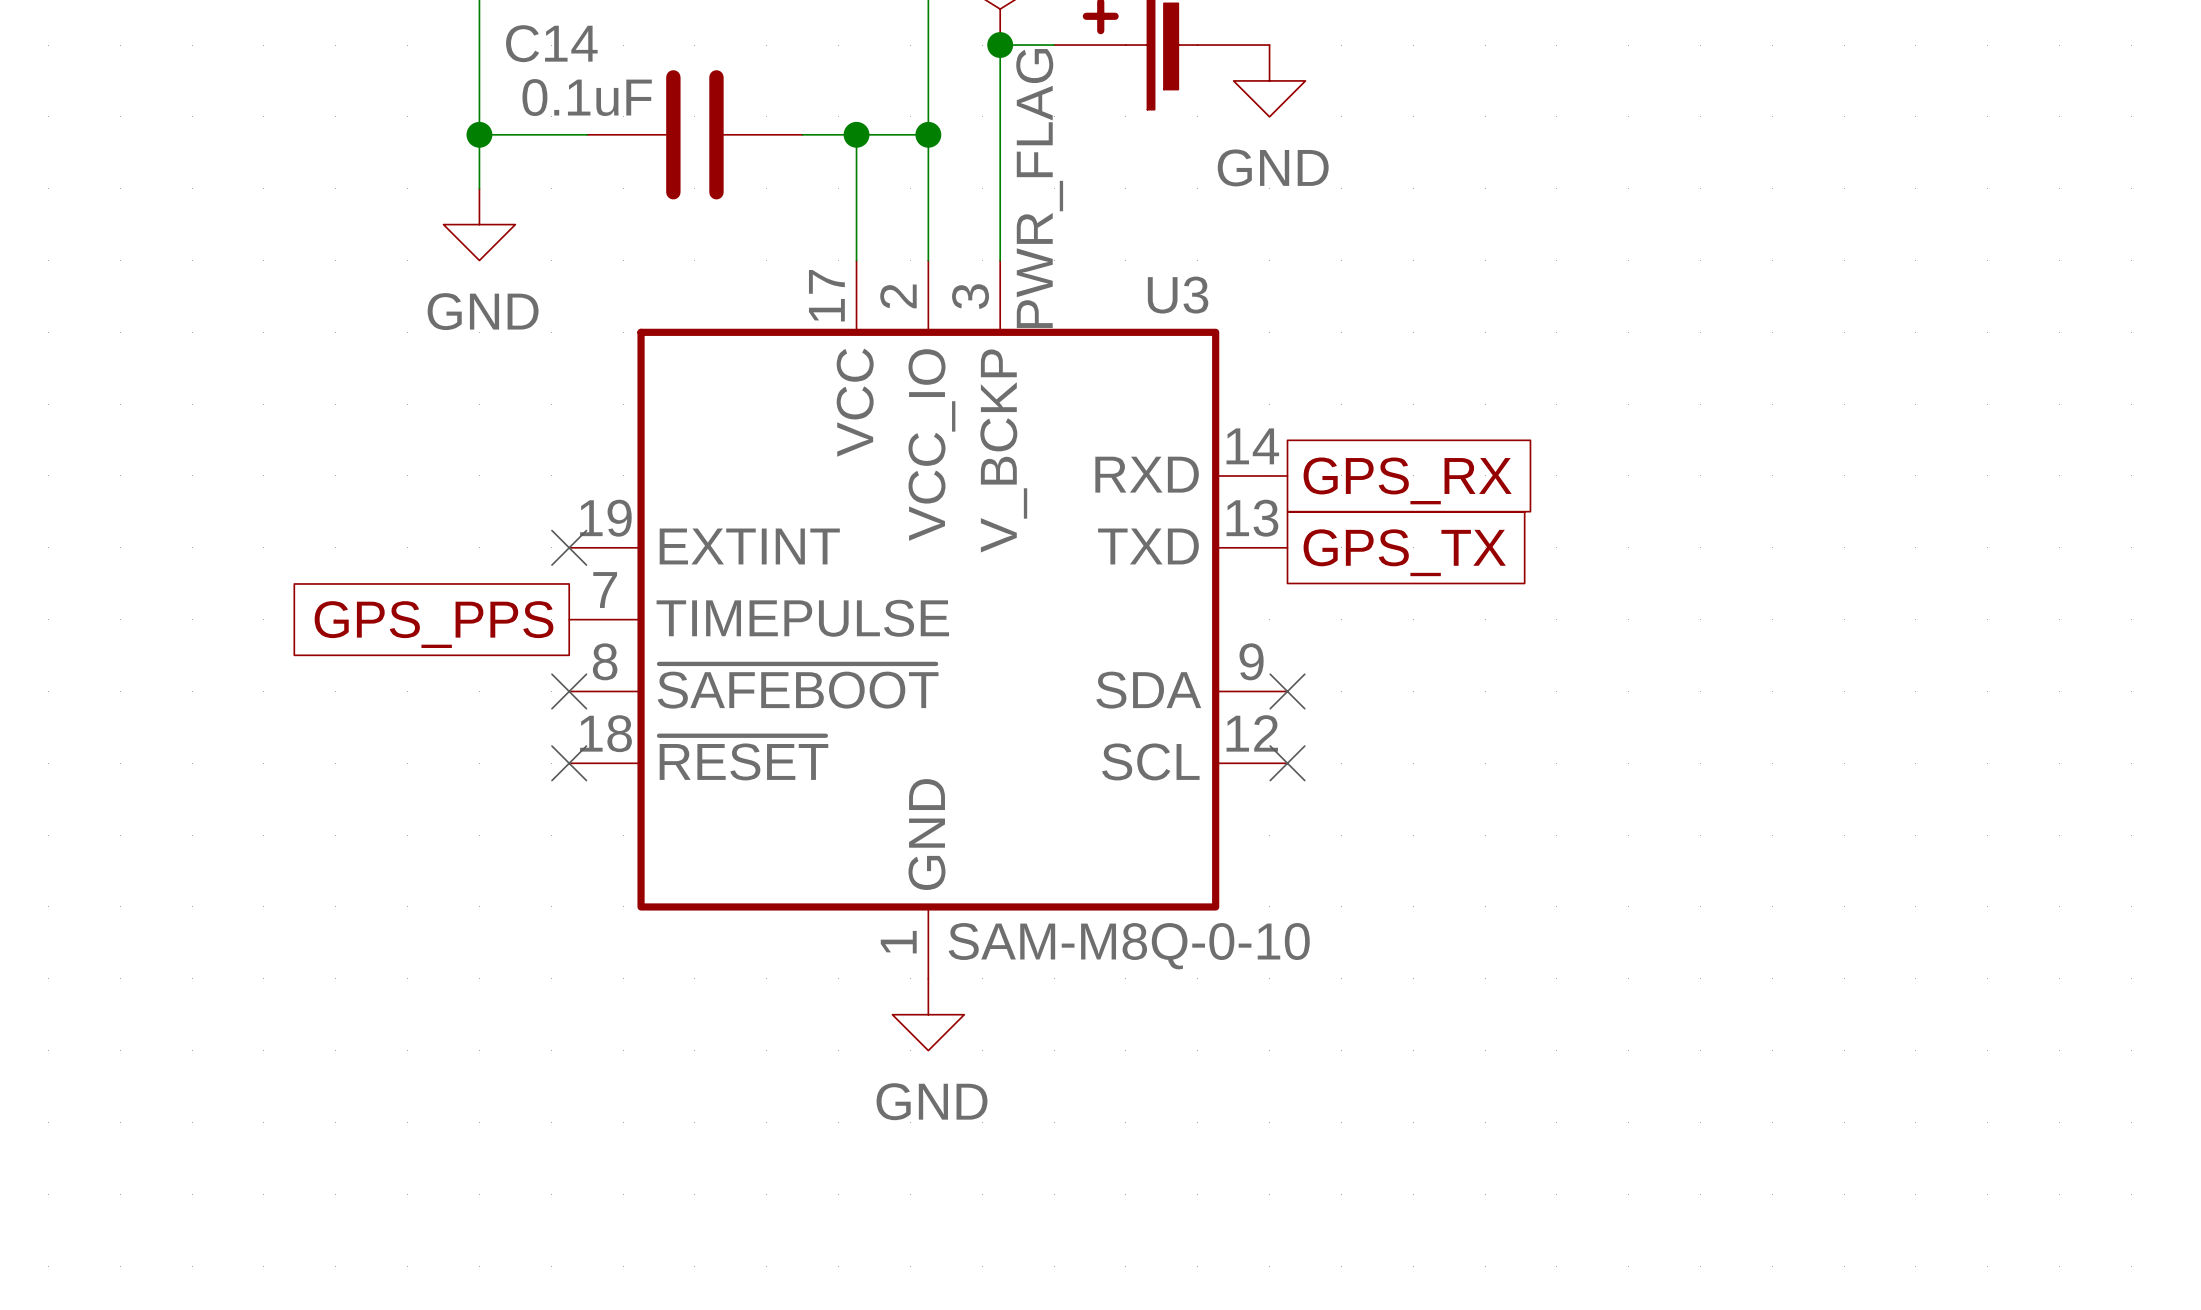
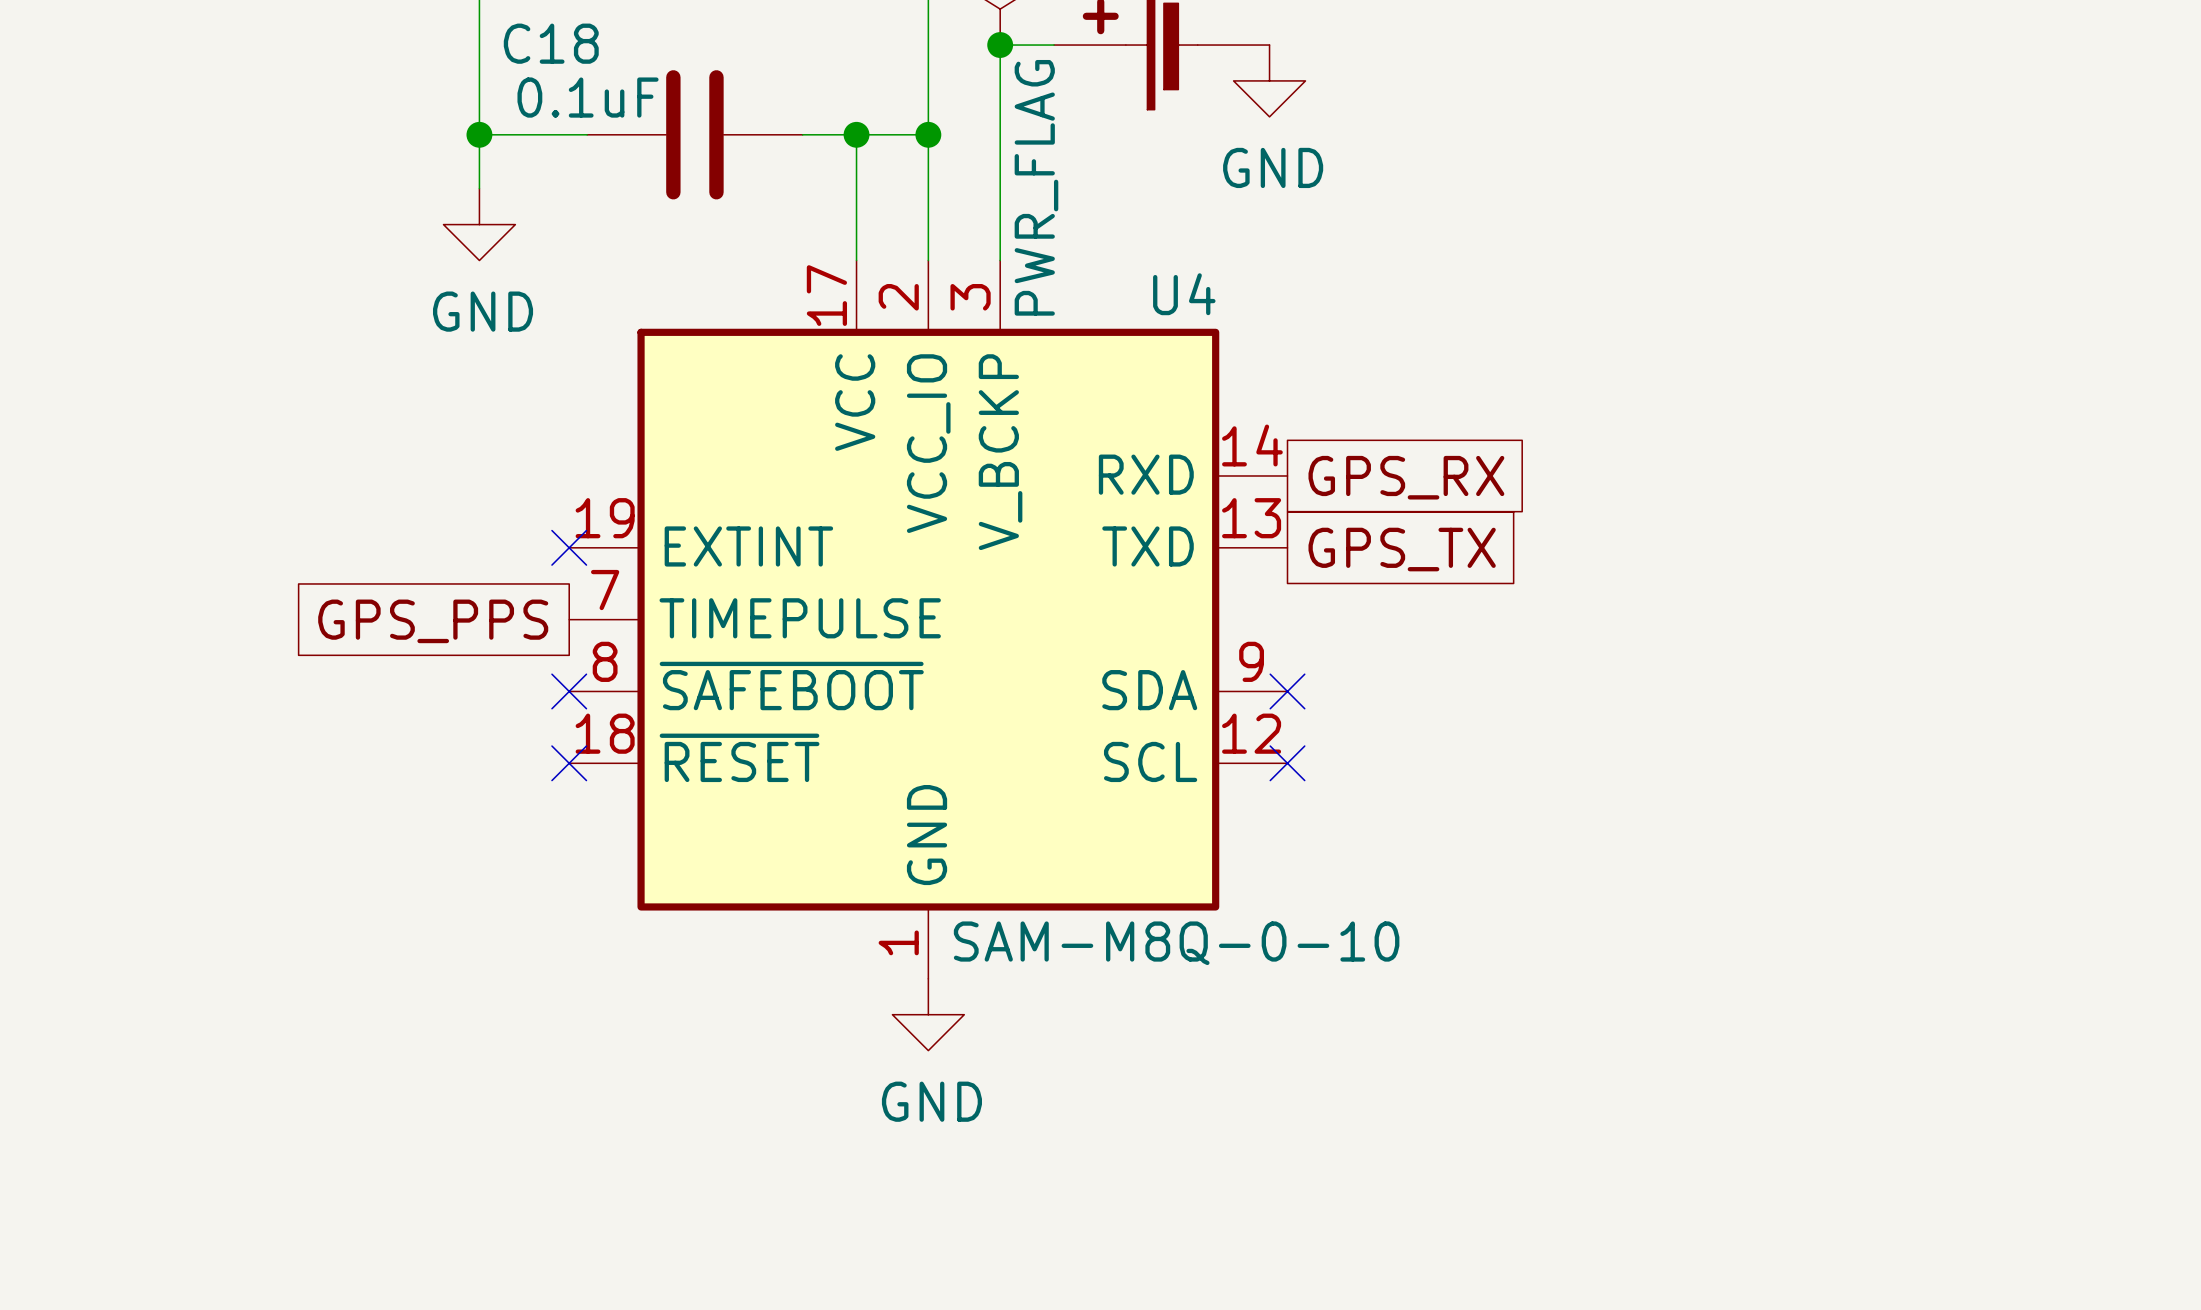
C14 name: C14 (551, 43) -> C18 (551, 43)
U3 name: U3 (1178, 295) -> U4 (1184, 294)

